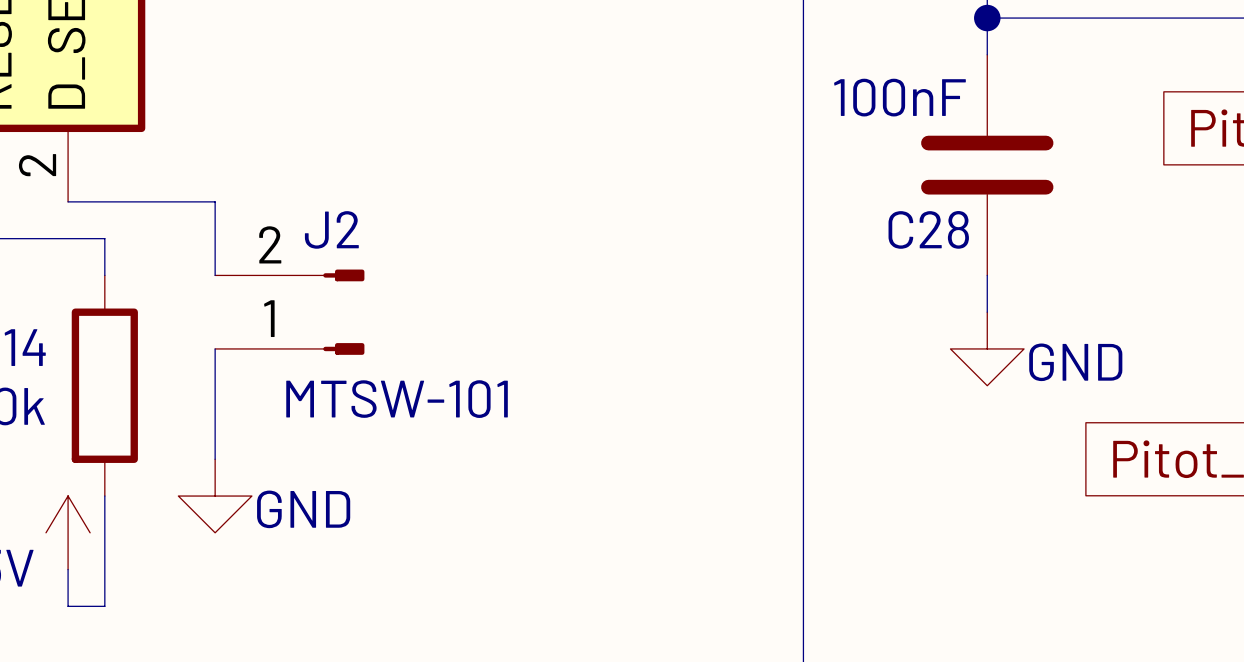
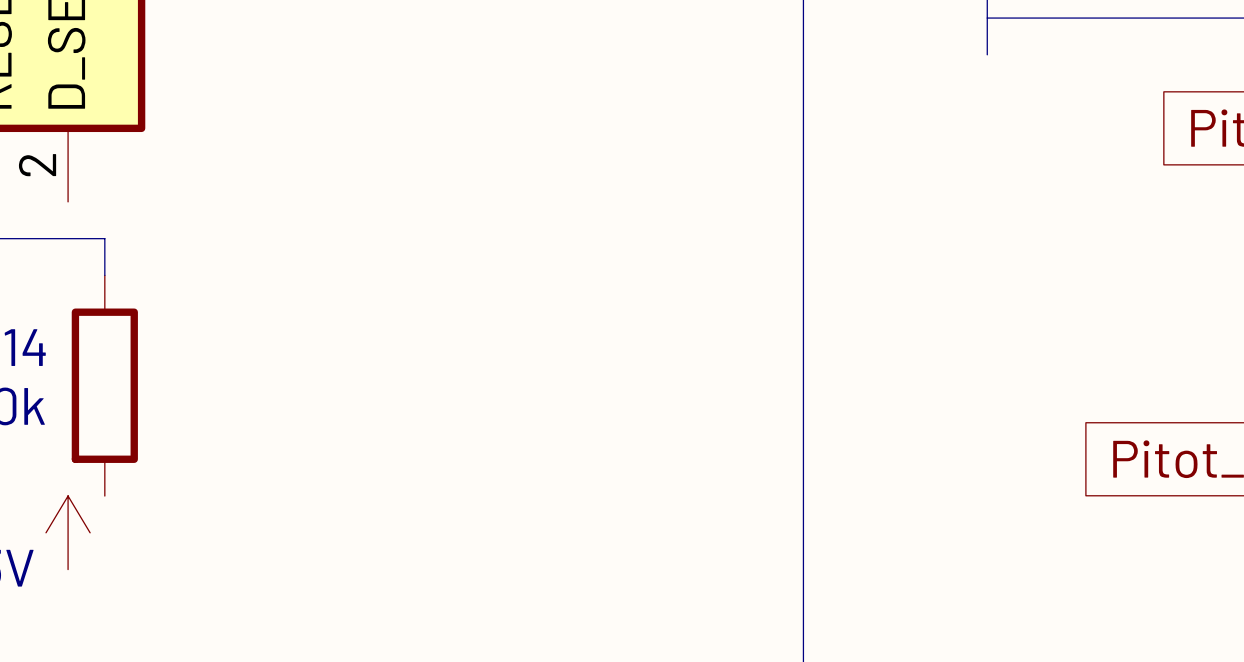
junction: (987, 18) -> none
C28: 100nF (987, 165) -> none
wire: (68, 201) (215, 201) (215, 275) -> none
wire: (987, 275) (987, 312) -> none
J2: MTSW-101 (289, 312) -> none
wire: (215, 348) (215, 459) -> none
power symbol: GND (987, 348) -> none
wire: (104, 496) (104, 606) (68, 606) (68, 569) -> none
power symbol: GND (215, 496) -> none

